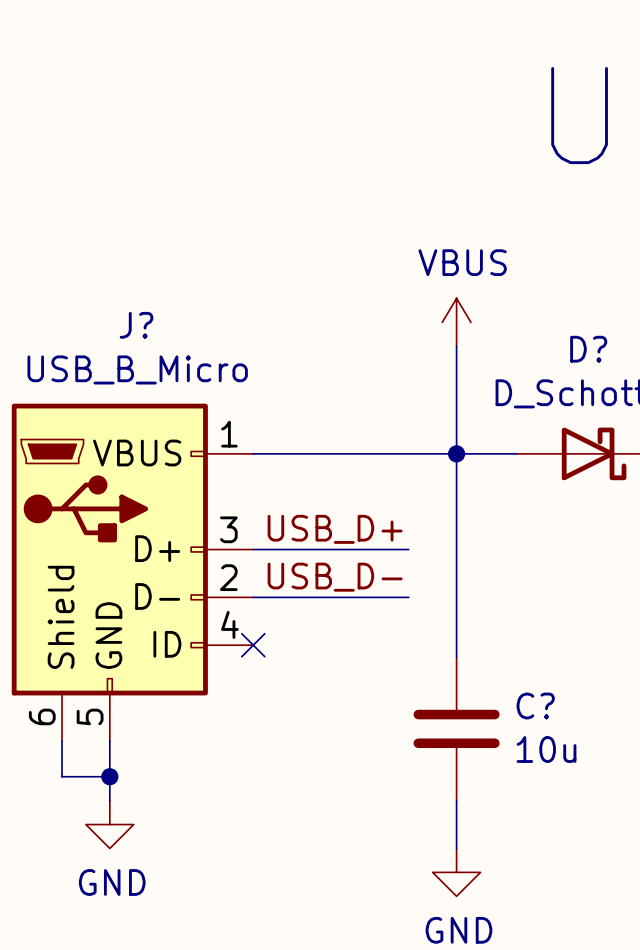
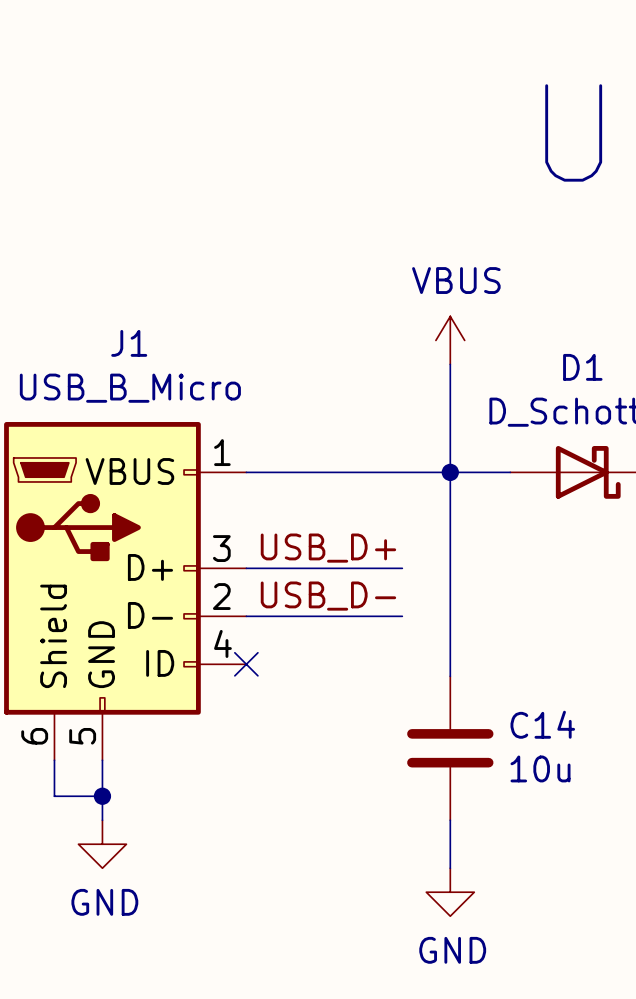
J? name: J? (136, 325) -> J1 (129, 343)
D? name: D? (588, 349) -> D1 (582, 367)
C? name: C? (535, 706) -> C14 (542, 724)

